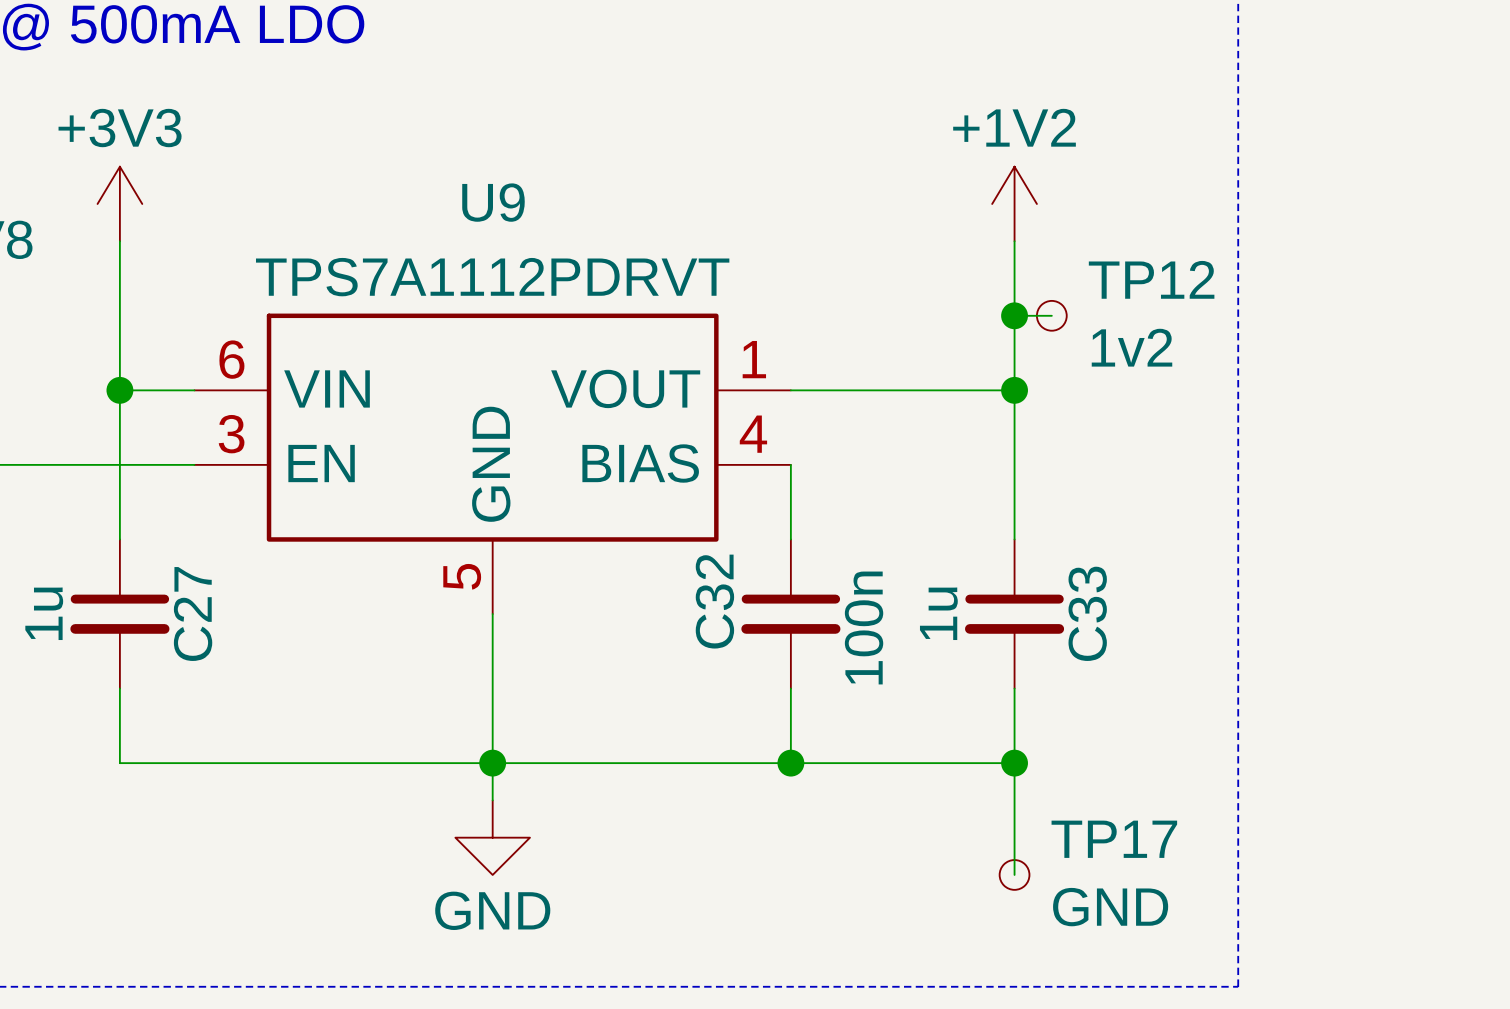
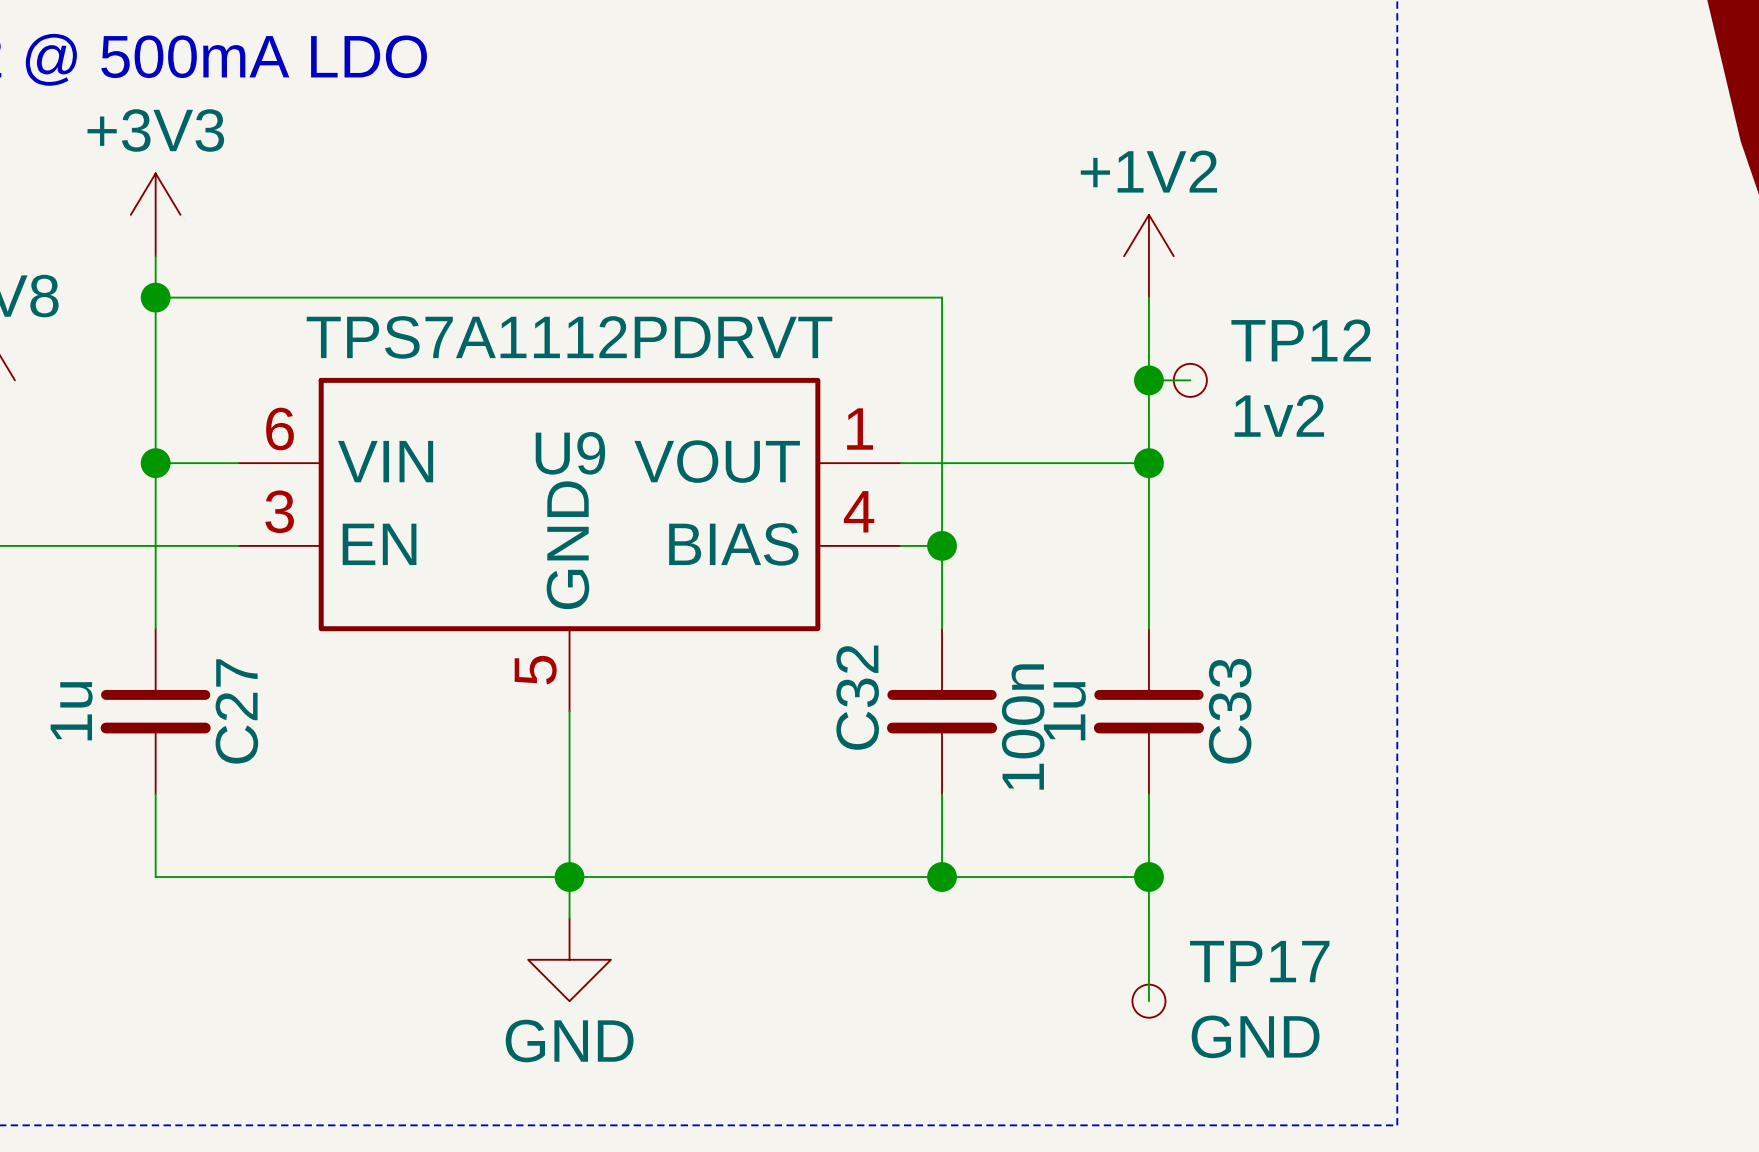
U9 name position: U9 (493, 202) -> U9 (570, 453)
wire: none -> (155, 256) (155, 297) (942, 297) (942, 628)
power symbol position: +3V3 (119, 203) -> +3V3 (155, 214)
junction: none -> (155, 297)
wire: (790, 464) (790, 539) -> (900, 545) (942, 545)
junction: none -> (942, 545)
C32 position: (790, 614) -> (942, 711)
wire: (790, 688) (790, 763) -> (942, 794) (942, 877)
junction position: (790, 763) -> (942, 877)

